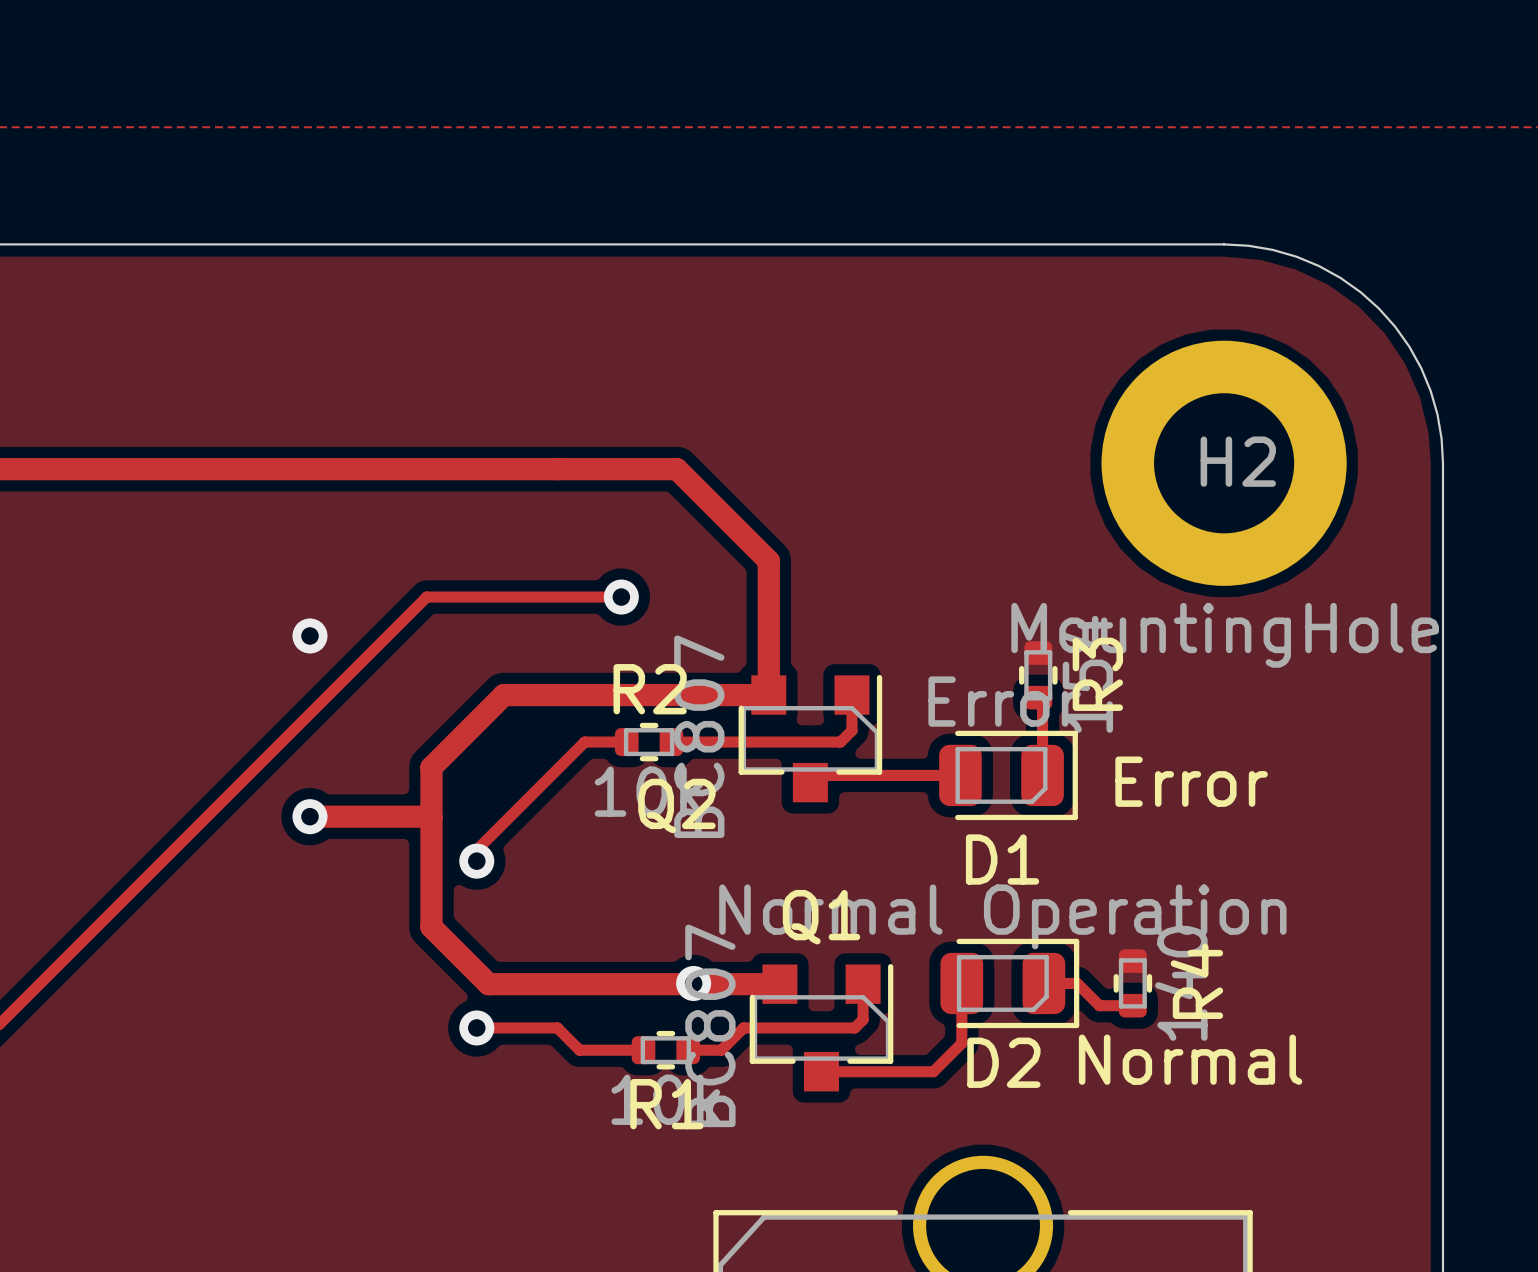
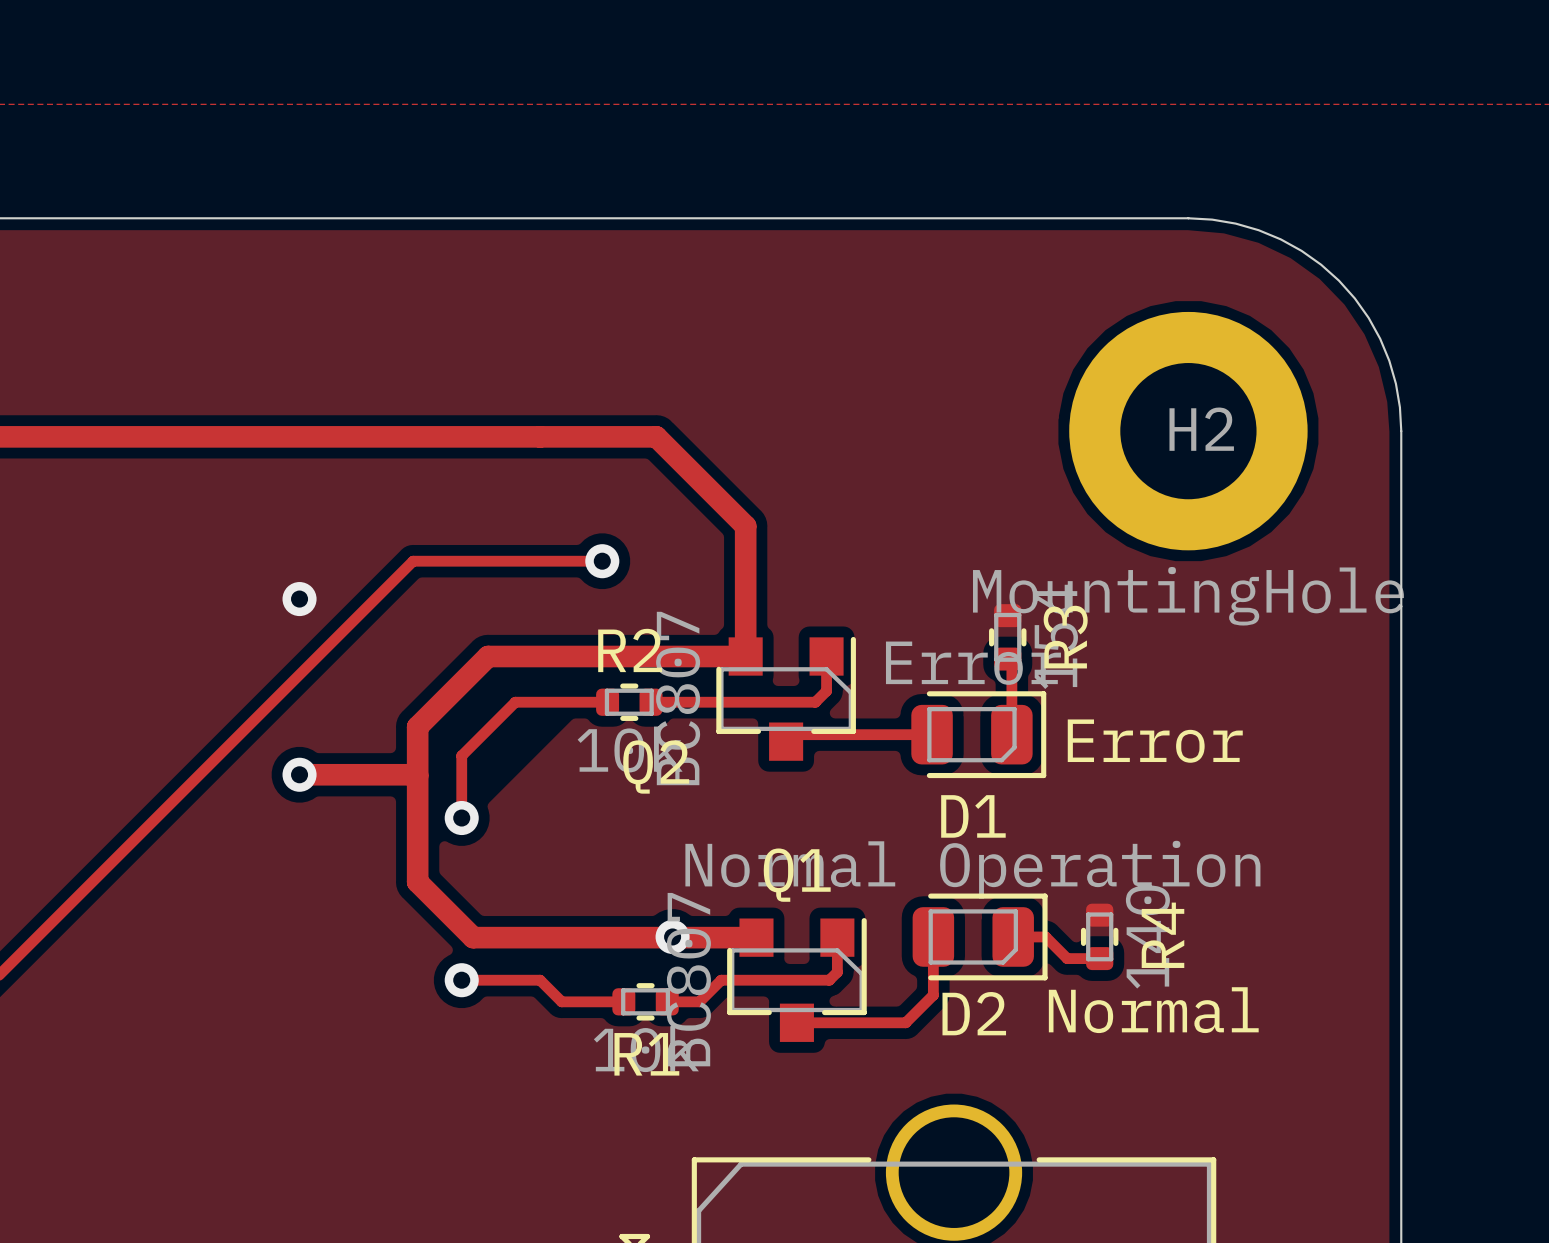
track: (584, 742) (476, 850) -> (566, 702) (515, 702) (461, 755) (461, 807)

